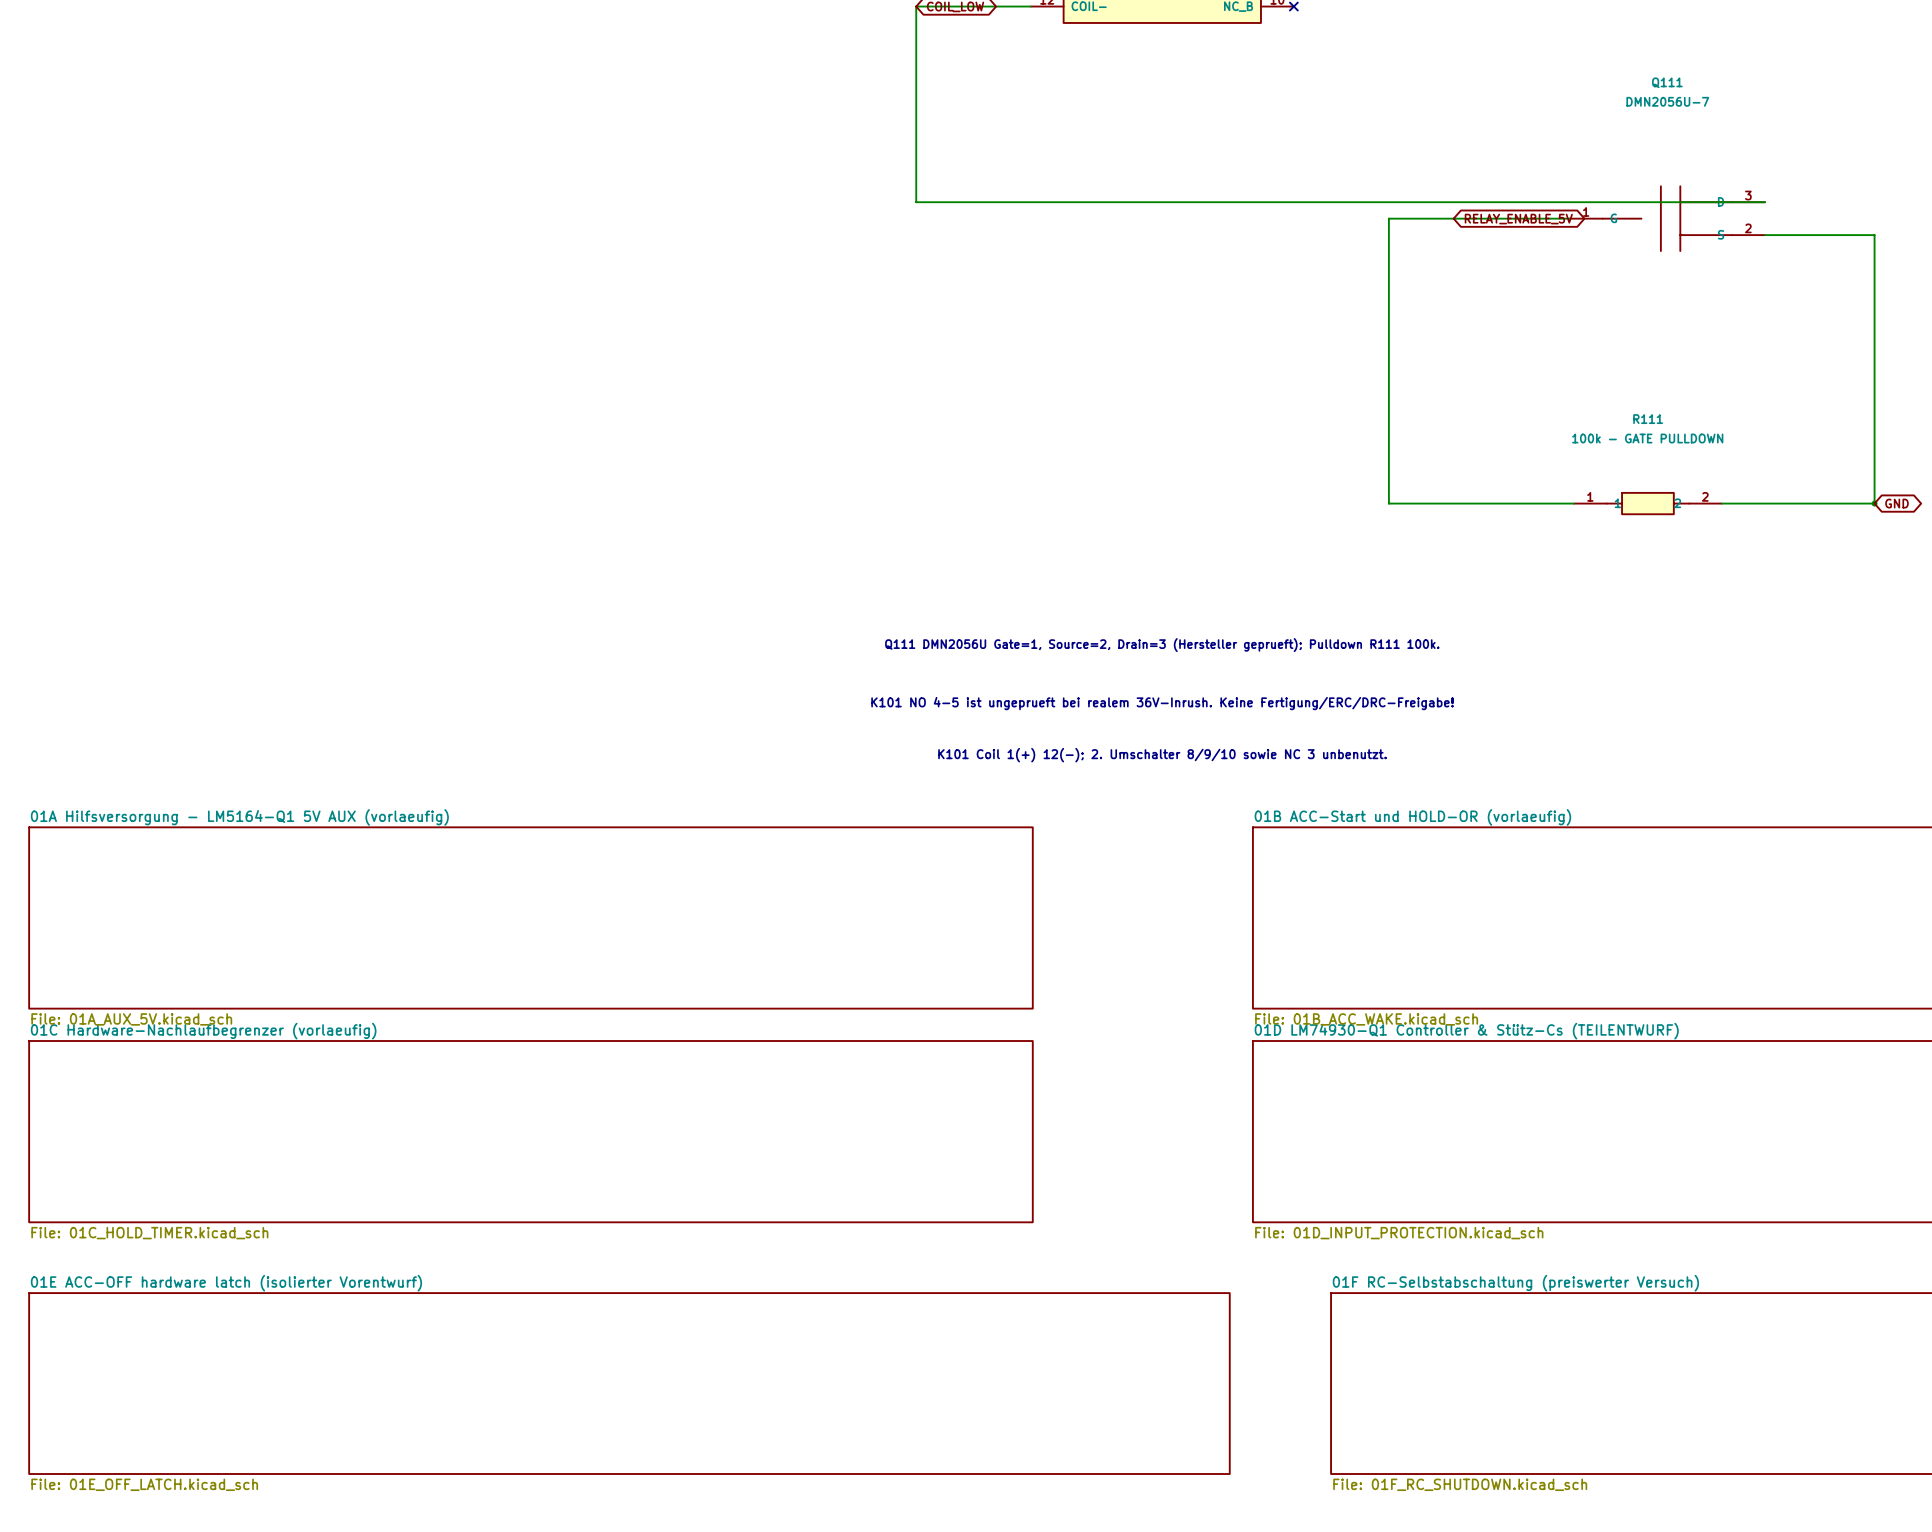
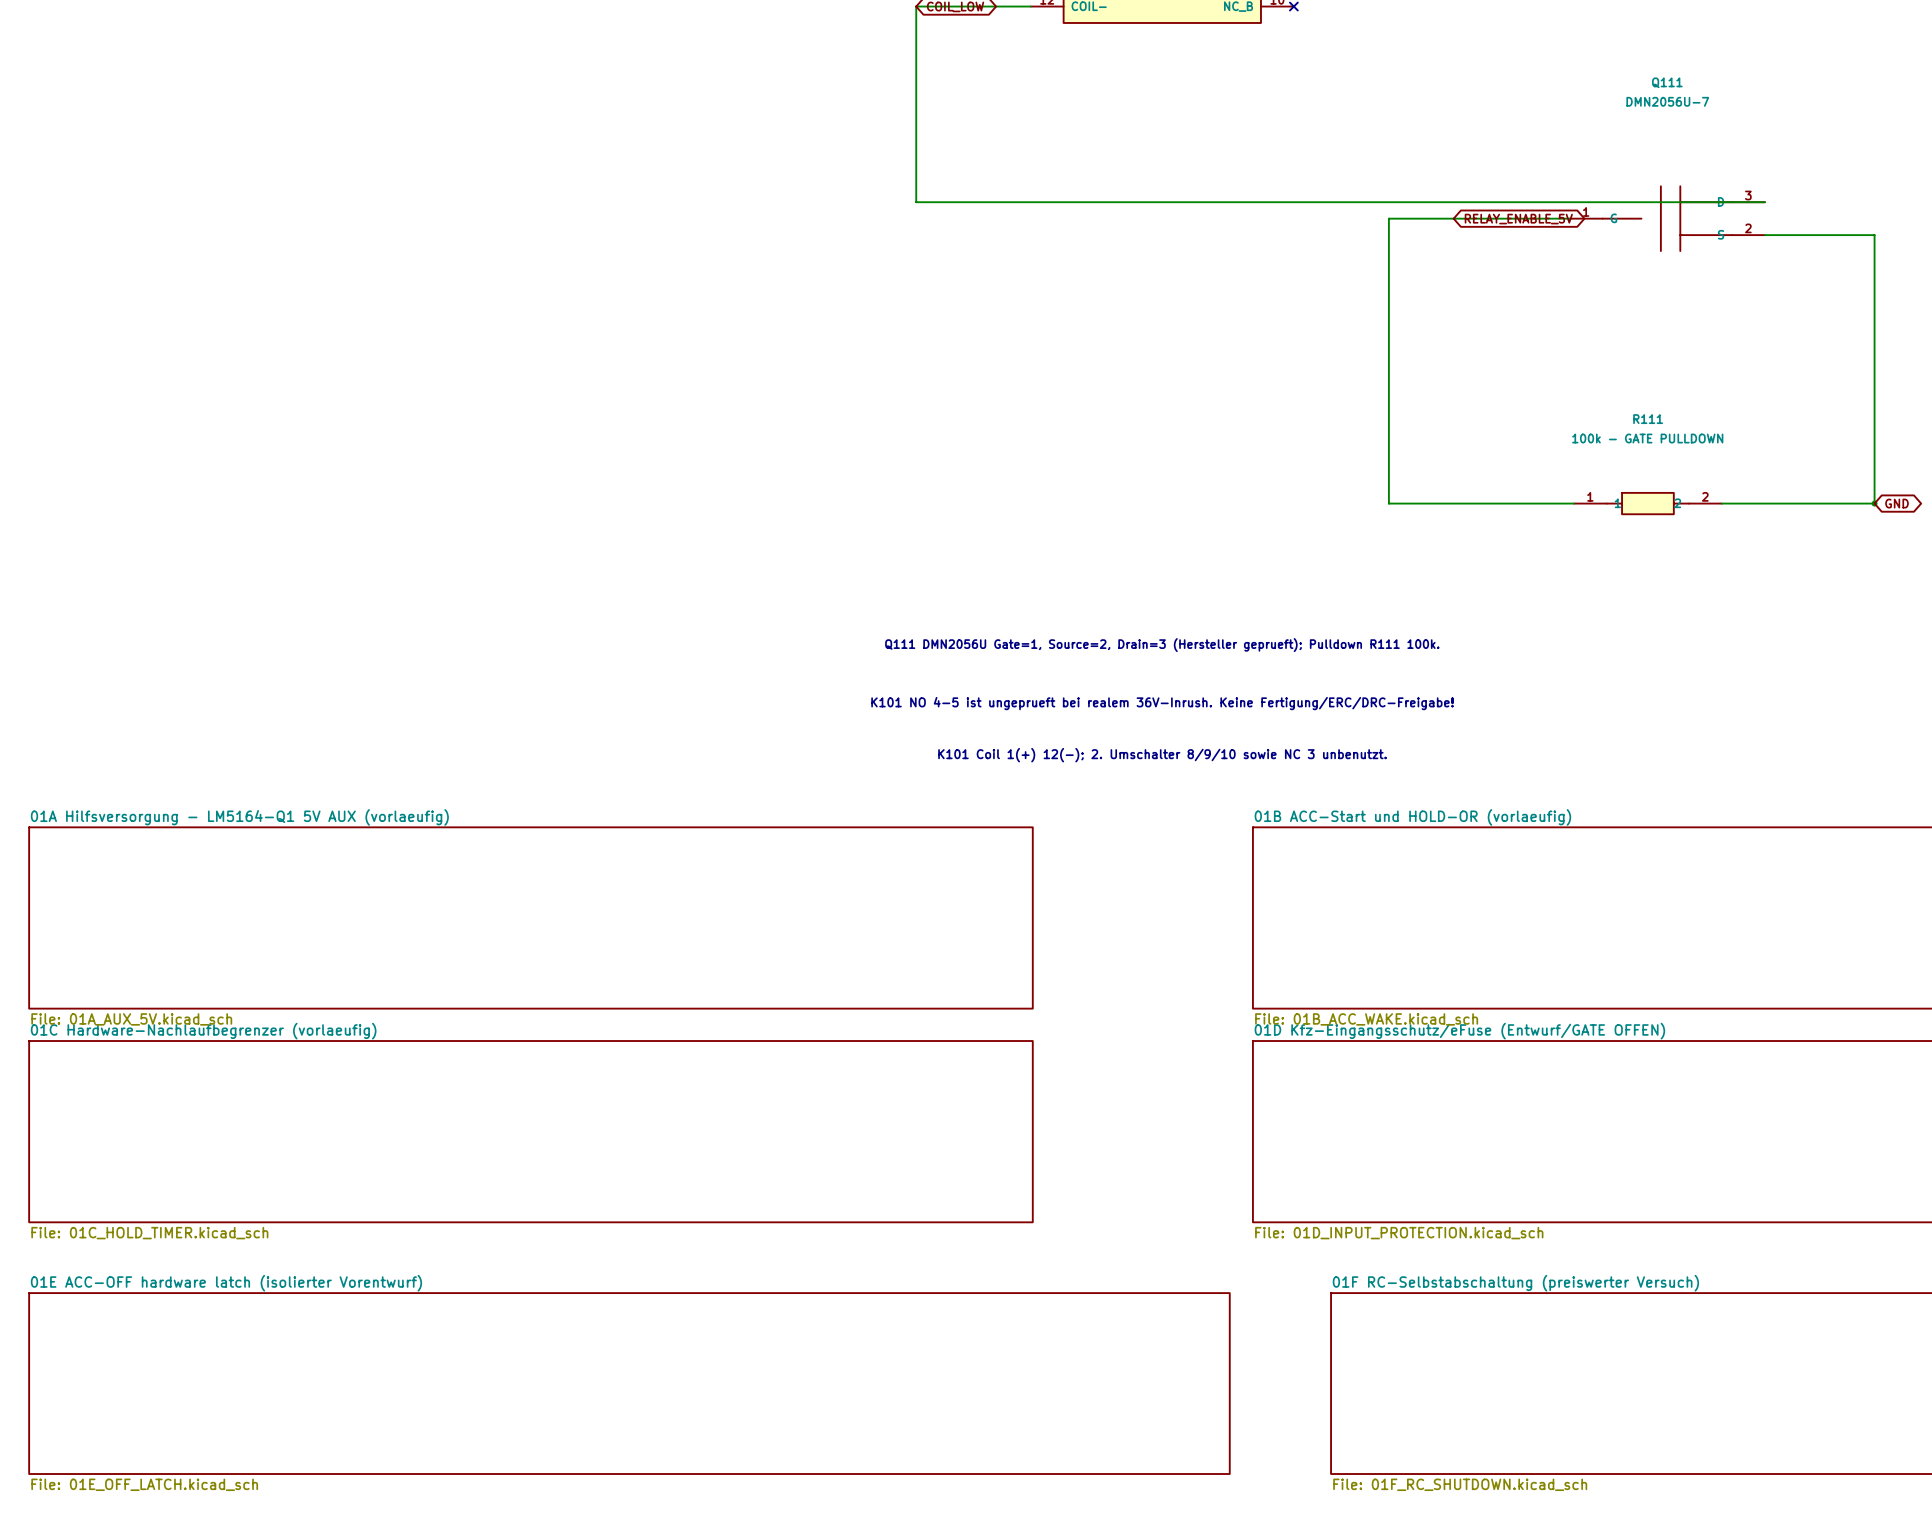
sheet 01D LM74930-Q1 Controller & Stütz-Cs (TEILENTWURF) name: 01D LM74930-Q1 Controller & Stütz-Cs (TEILENTWURF) (1466, 1031) -> 01D Kfz-Eingangsschutz/eFuse (Entwurf/GATE OFFEN) (1459, 1031)

